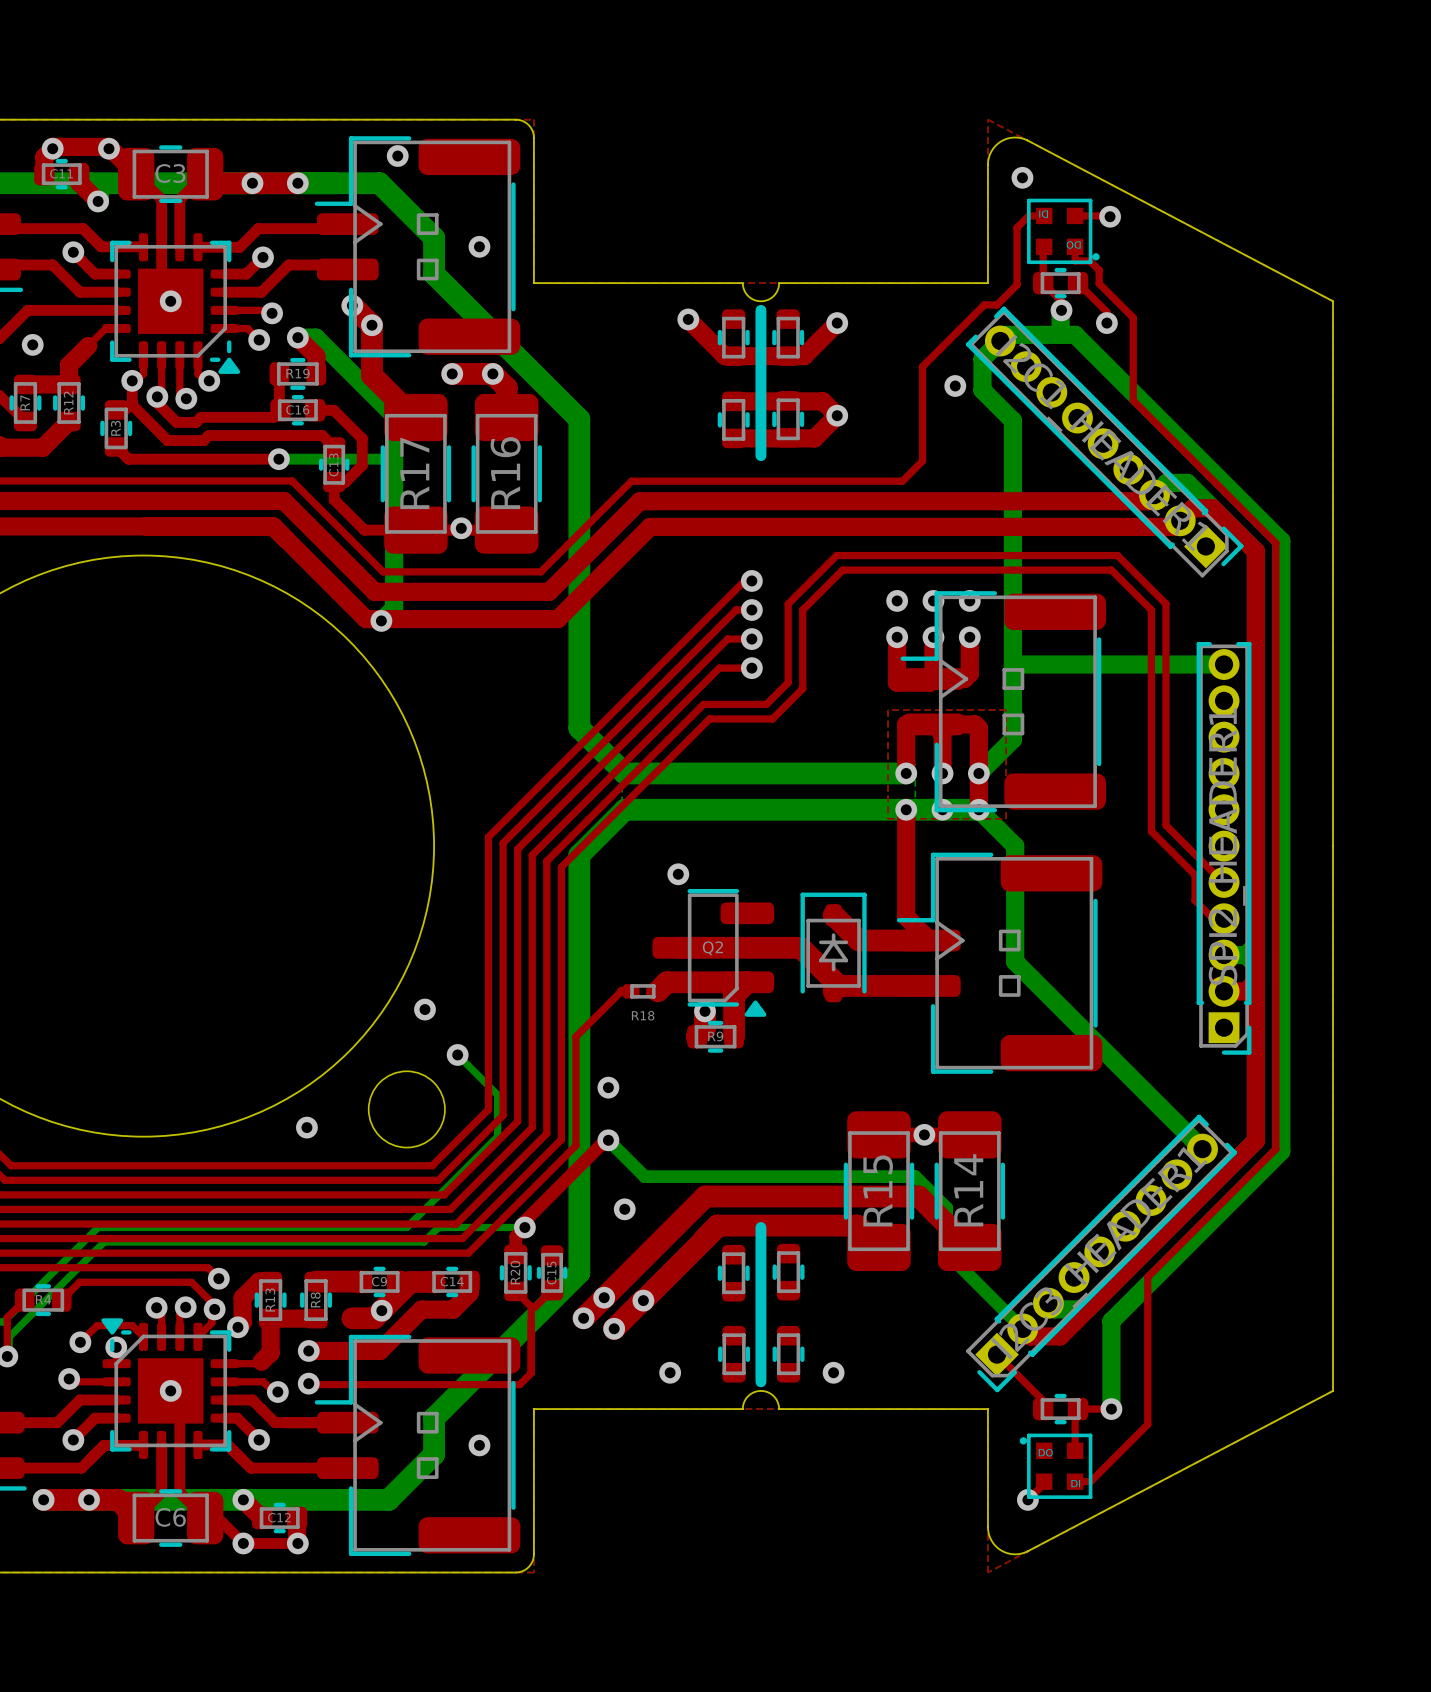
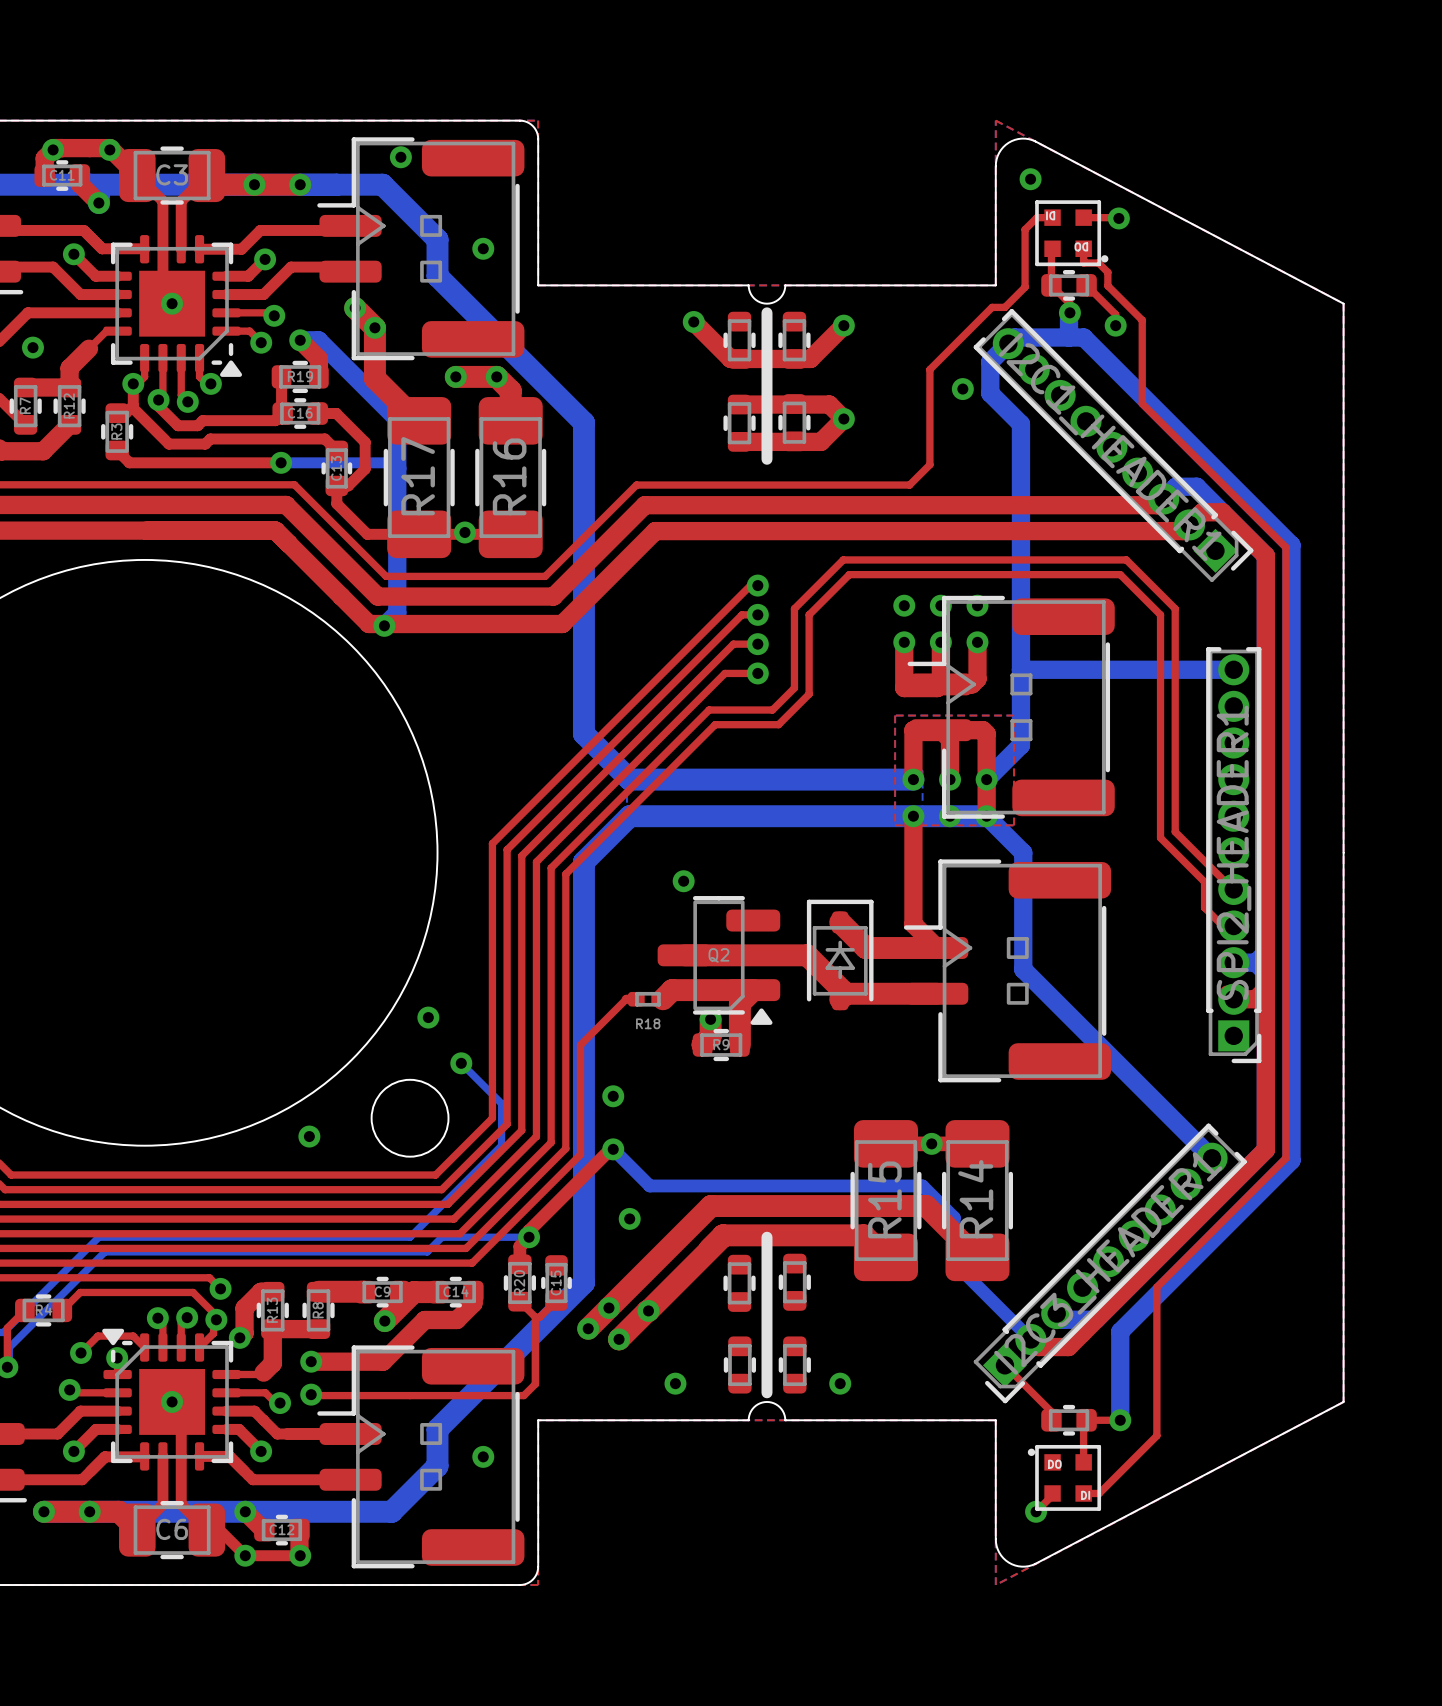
top track: (381, 1310) (374, 1318) (352, 1318) -> none

